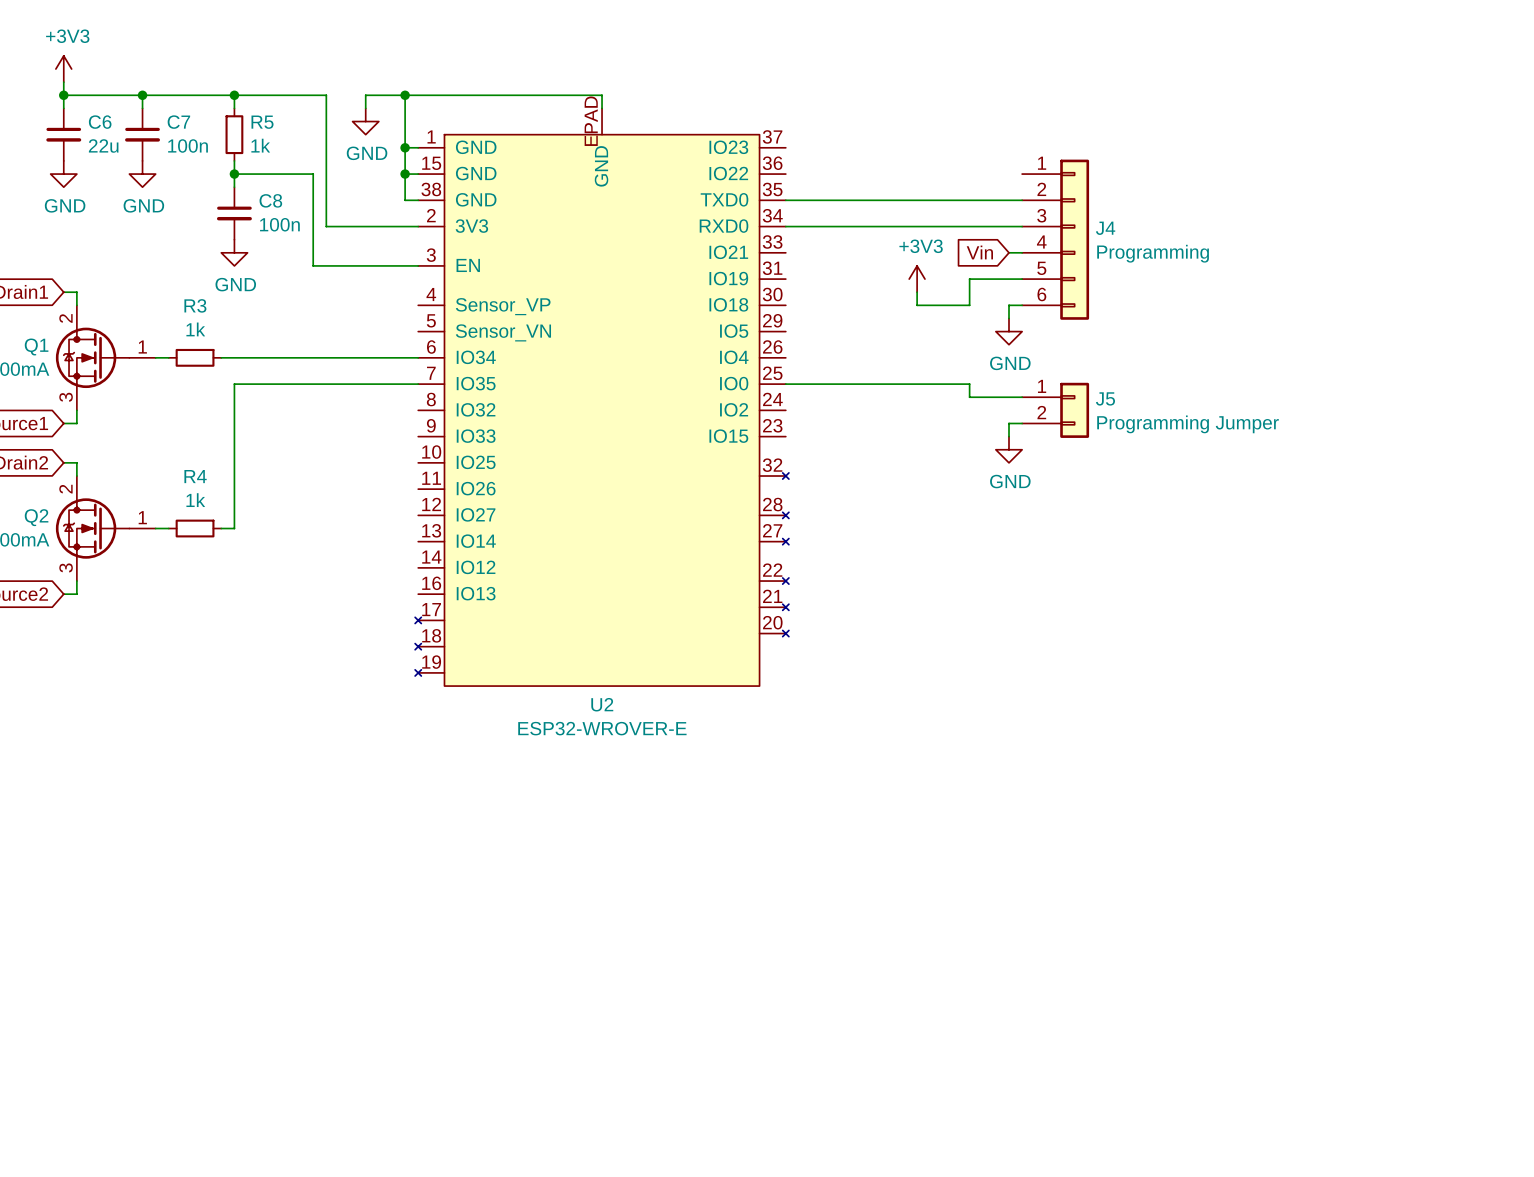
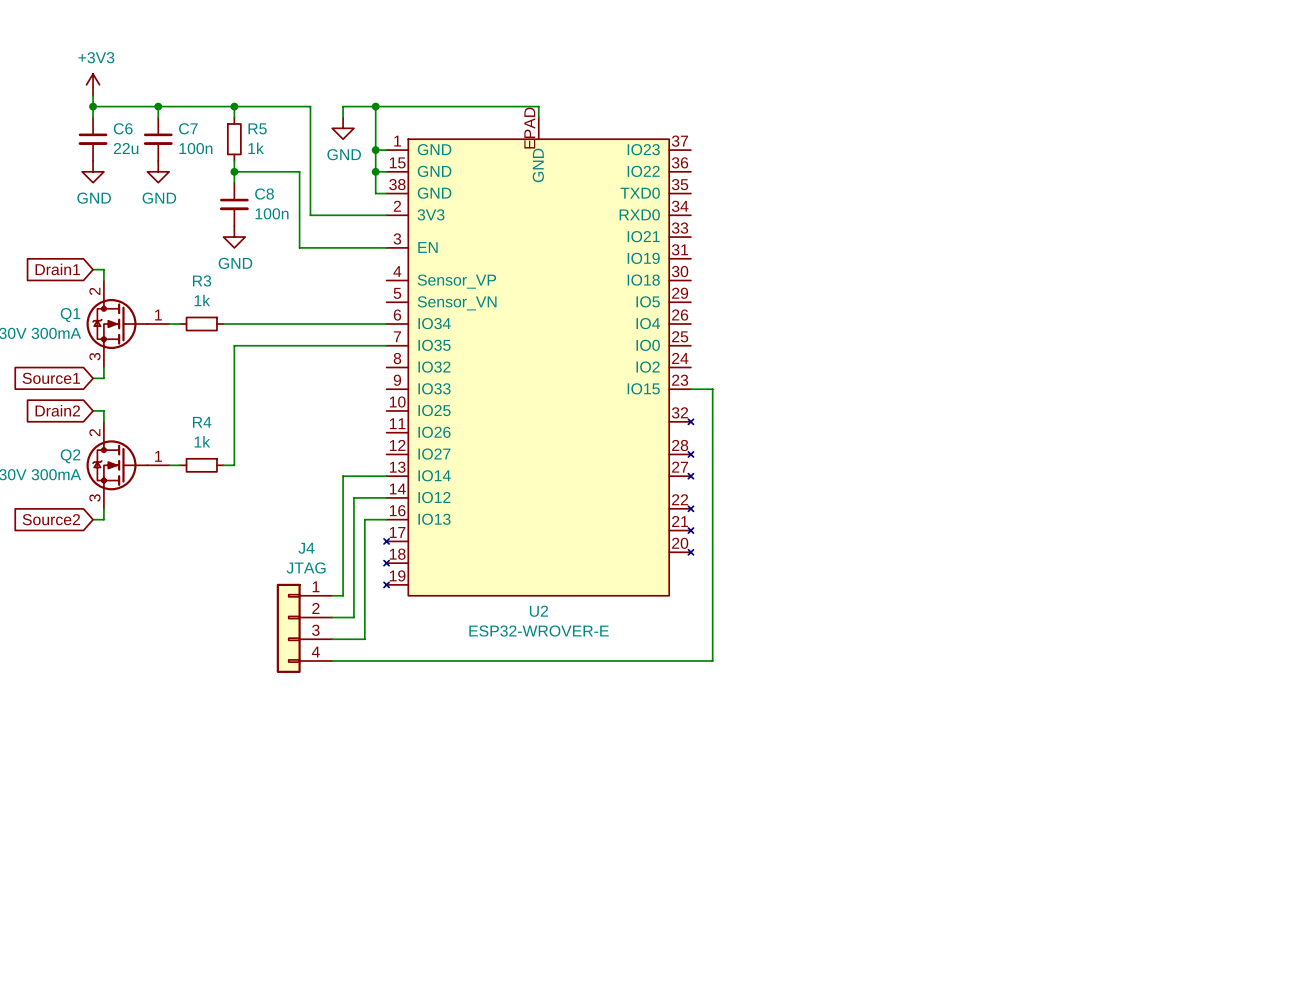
J4 symbol: [1022, 159, 1090, 320] -> [276, 583, 333, 673]
wire: (785, 200) (1022, 200) -> none
wire: (785, 226) (1022, 226) -> none
J4 name position: J4 (1105, 228) -> J4 (306, 548)
global label: Vin (979, 252) -> none
wire: (1008, 252) (1022, 252) -> none
J4 value: Programming (1153, 253) -> JTAG (306, 567)
power symbol: +3V3 (917, 279) -> none
wire: (1022, 279) (969, 279) (969, 305) (917, 305) (917, 292) -> none
wire: (1022, 305) (1008, 305) (1008, 318) -> none
power symbol: GND (1008, 331) -> none
wire: (785, 384) (969, 384) (969, 397) (1022, 397) -> none
J5: Programming Jumper (1055, 410) -> none
wire: (1022, 423) (1008, 423) (1008, 436) -> none
wire: none -> (690, 389) (712, 389) (712, 660) (332, 660)
power symbol: GND (1008, 449) -> none
wire: none -> (386, 476) (343, 476) (343, 595) (332, 595)
wire: none -> (386, 497) (353, 497) (353, 617) (332, 617)
wire: none -> (386, 519) (364, 519) (364, 639) (332, 639)

